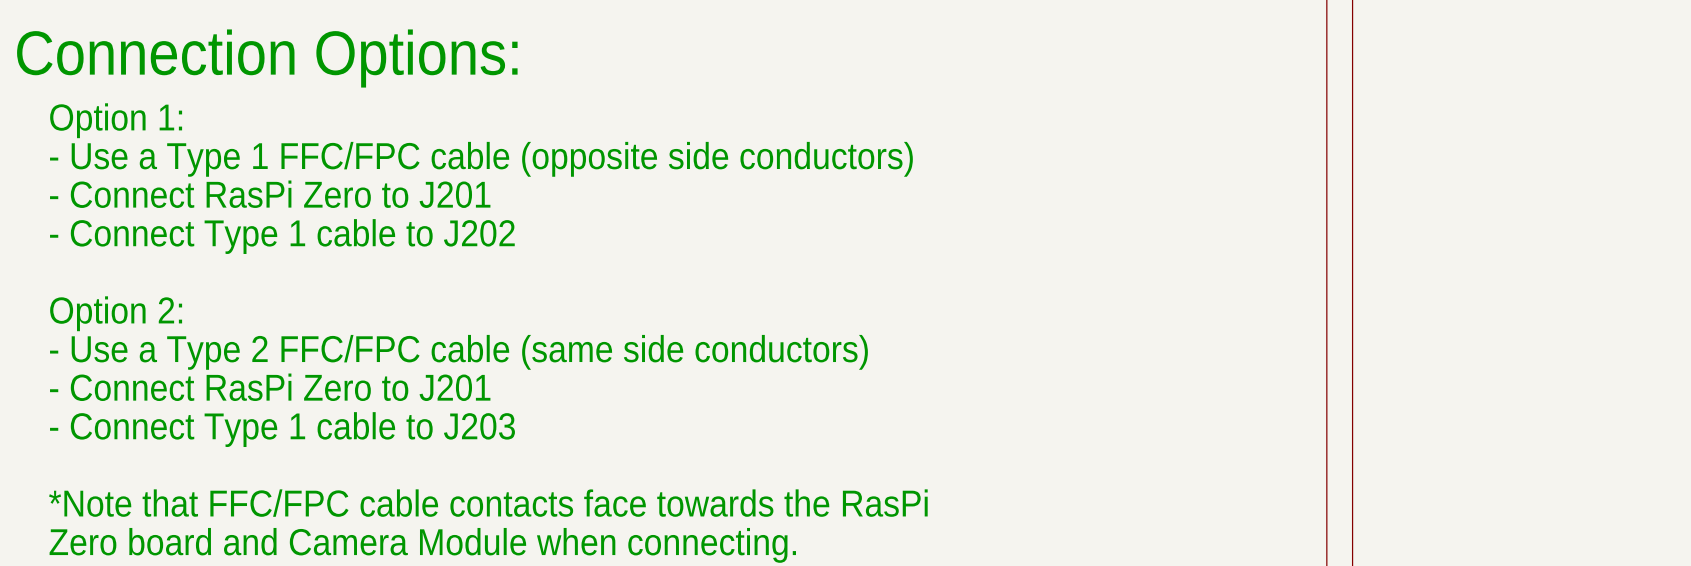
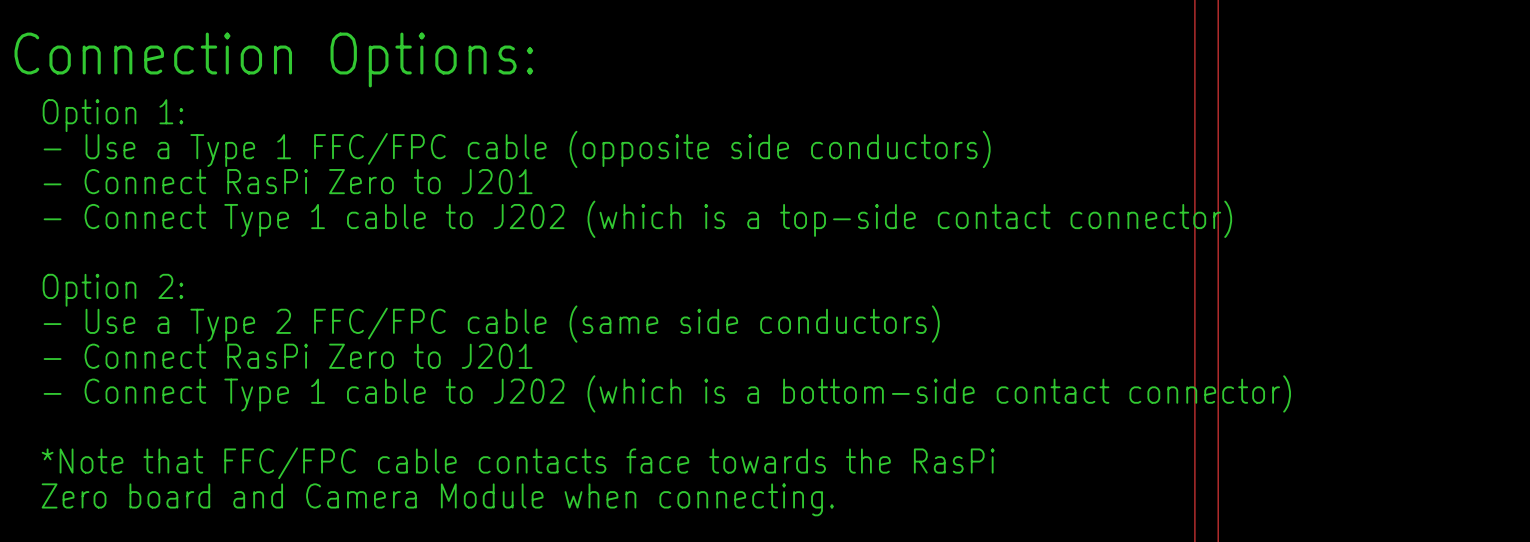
text: - Connect Type 1 cable to J202 (282, 236) -> - Connect Type 1 cable to J202 (which is a top-side contact connector) (637, 219)
text: - Connect Type 1 cable to J203 (282, 429) -> - Connect Type 1 cable to J202 (which is a bottom-side contact connector) (667, 393)

